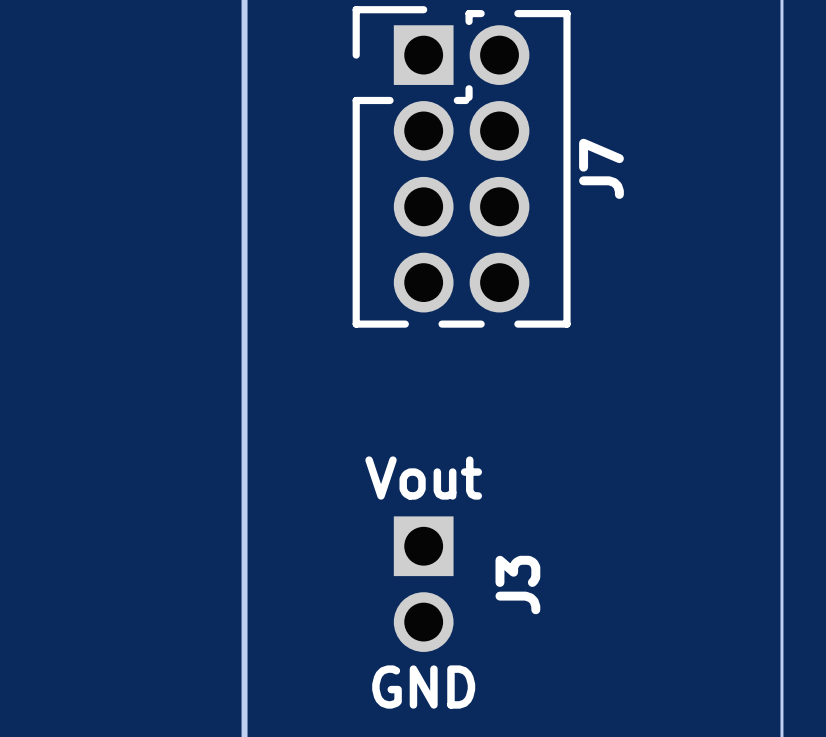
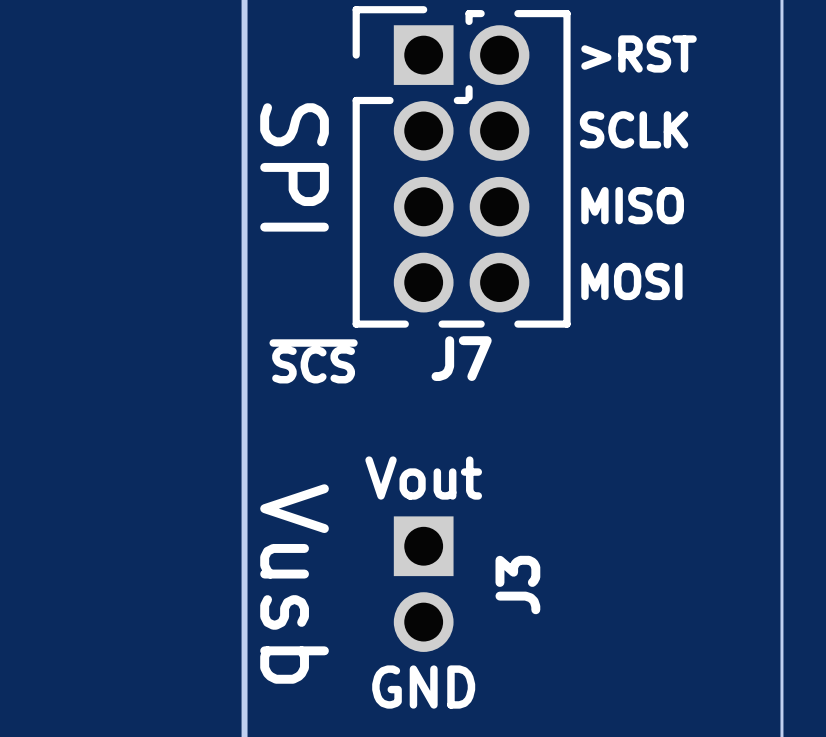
text: none -> >RST (639, 53)
text: none -> SCLK (634, 129)
text: none -> SPI (294, 167)
J7 name rotation: 0° (601, 168) -> 90° clockwise (461, 358)
J7 name position: J7 (601, 168) -> J7 (461, 358)
text: none -> MISO (632, 205)
text: none -> MOSI (631, 281)
text: none -> ~{SCS} (313, 361)
text: none -> Vusb (294, 584)

